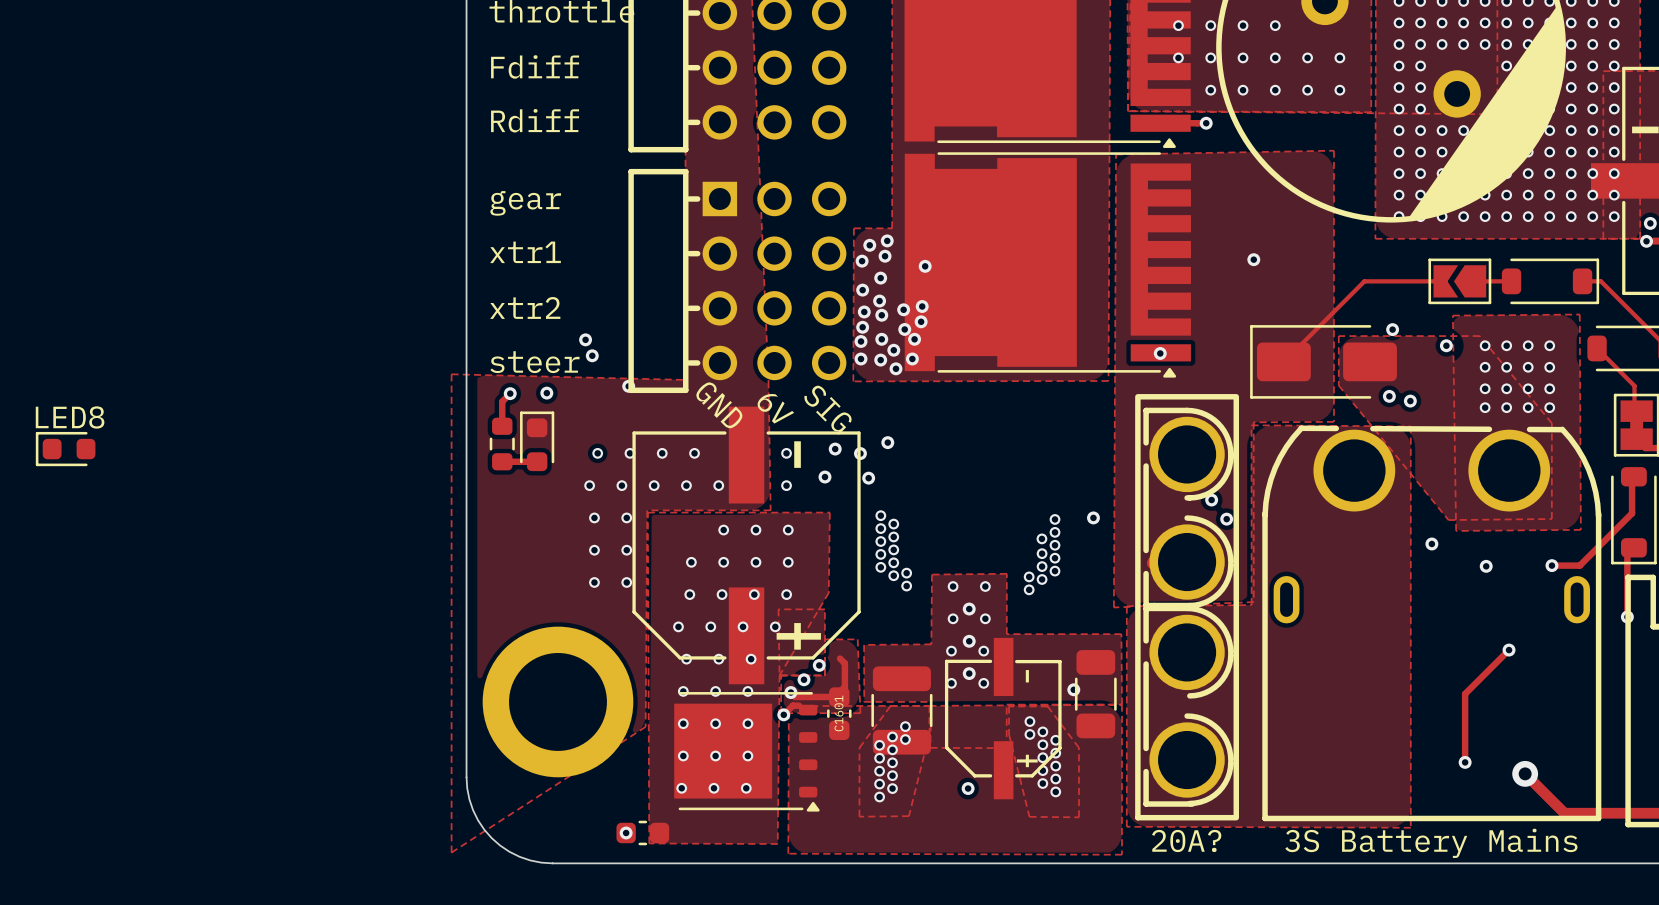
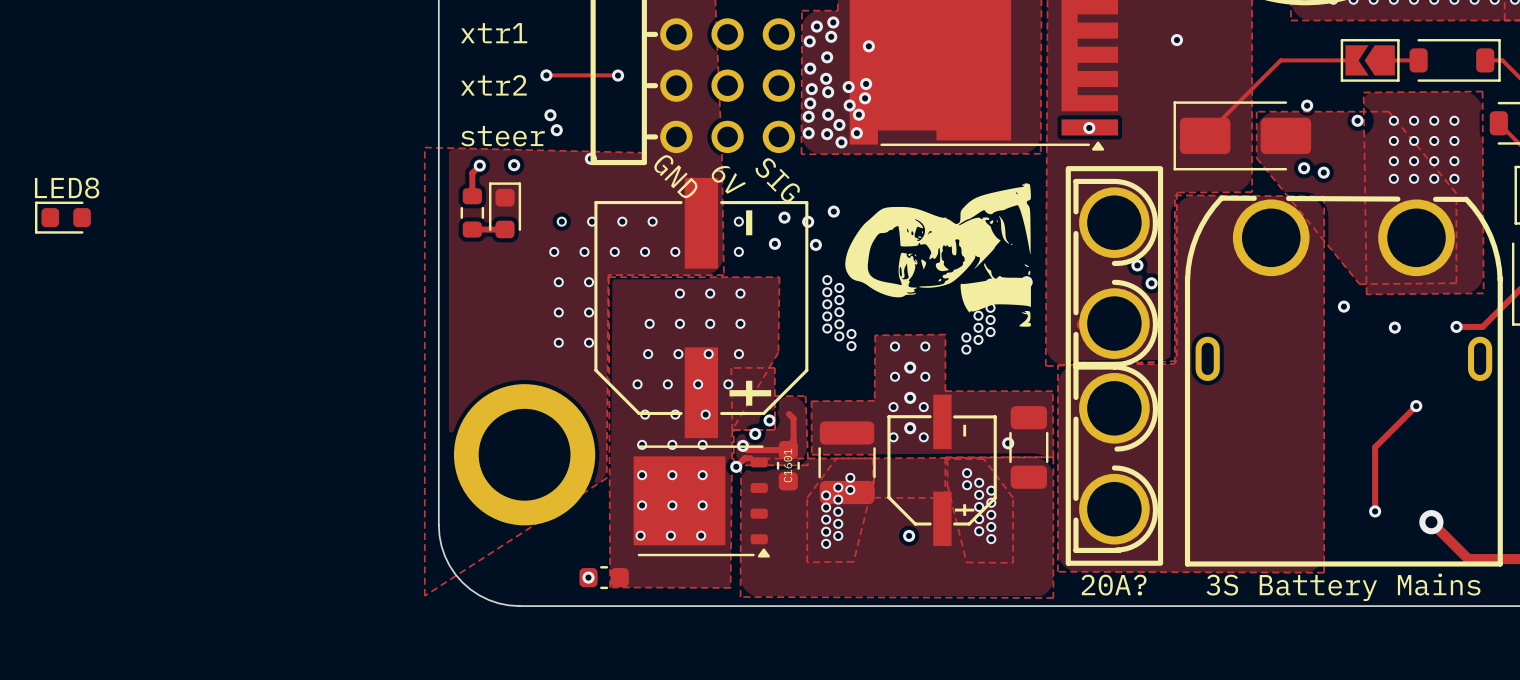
track: none -> (546, 75) (617, 75)
via: none -> (546, 75)
via: none -> (618, 75)
drawing: none -> [845, 183, 1031, 327]

